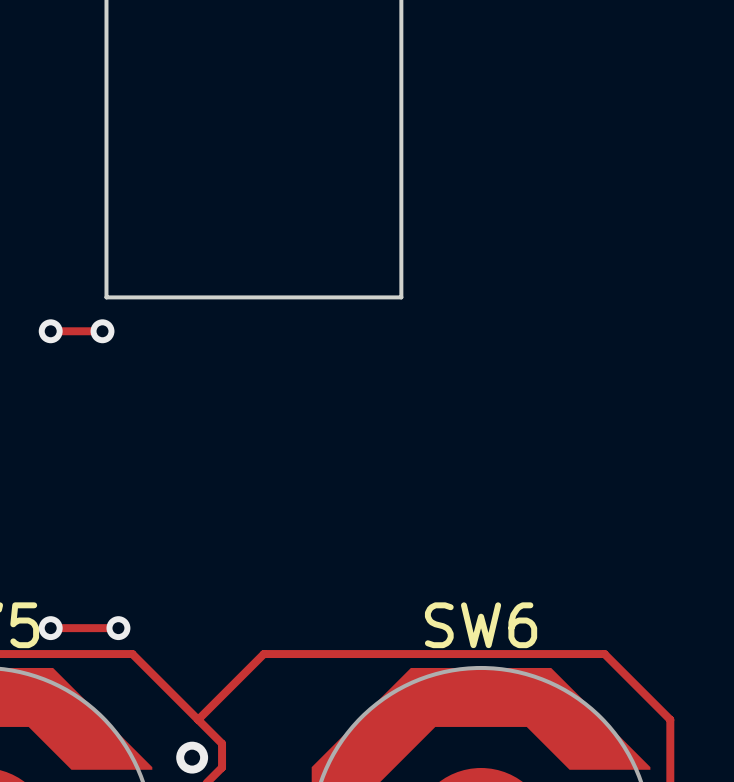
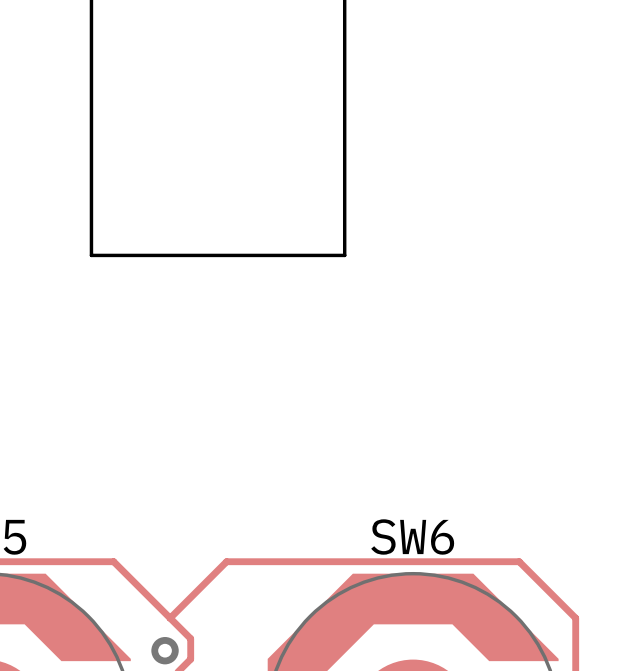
track: (50, 331) (102, 331) -> none
via: (50, 331) -> none
via: (102, 331) -> none
track: (50, 628) (118, 628) -> none
via: (50, 628) -> none
via: (118, 628) -> none

